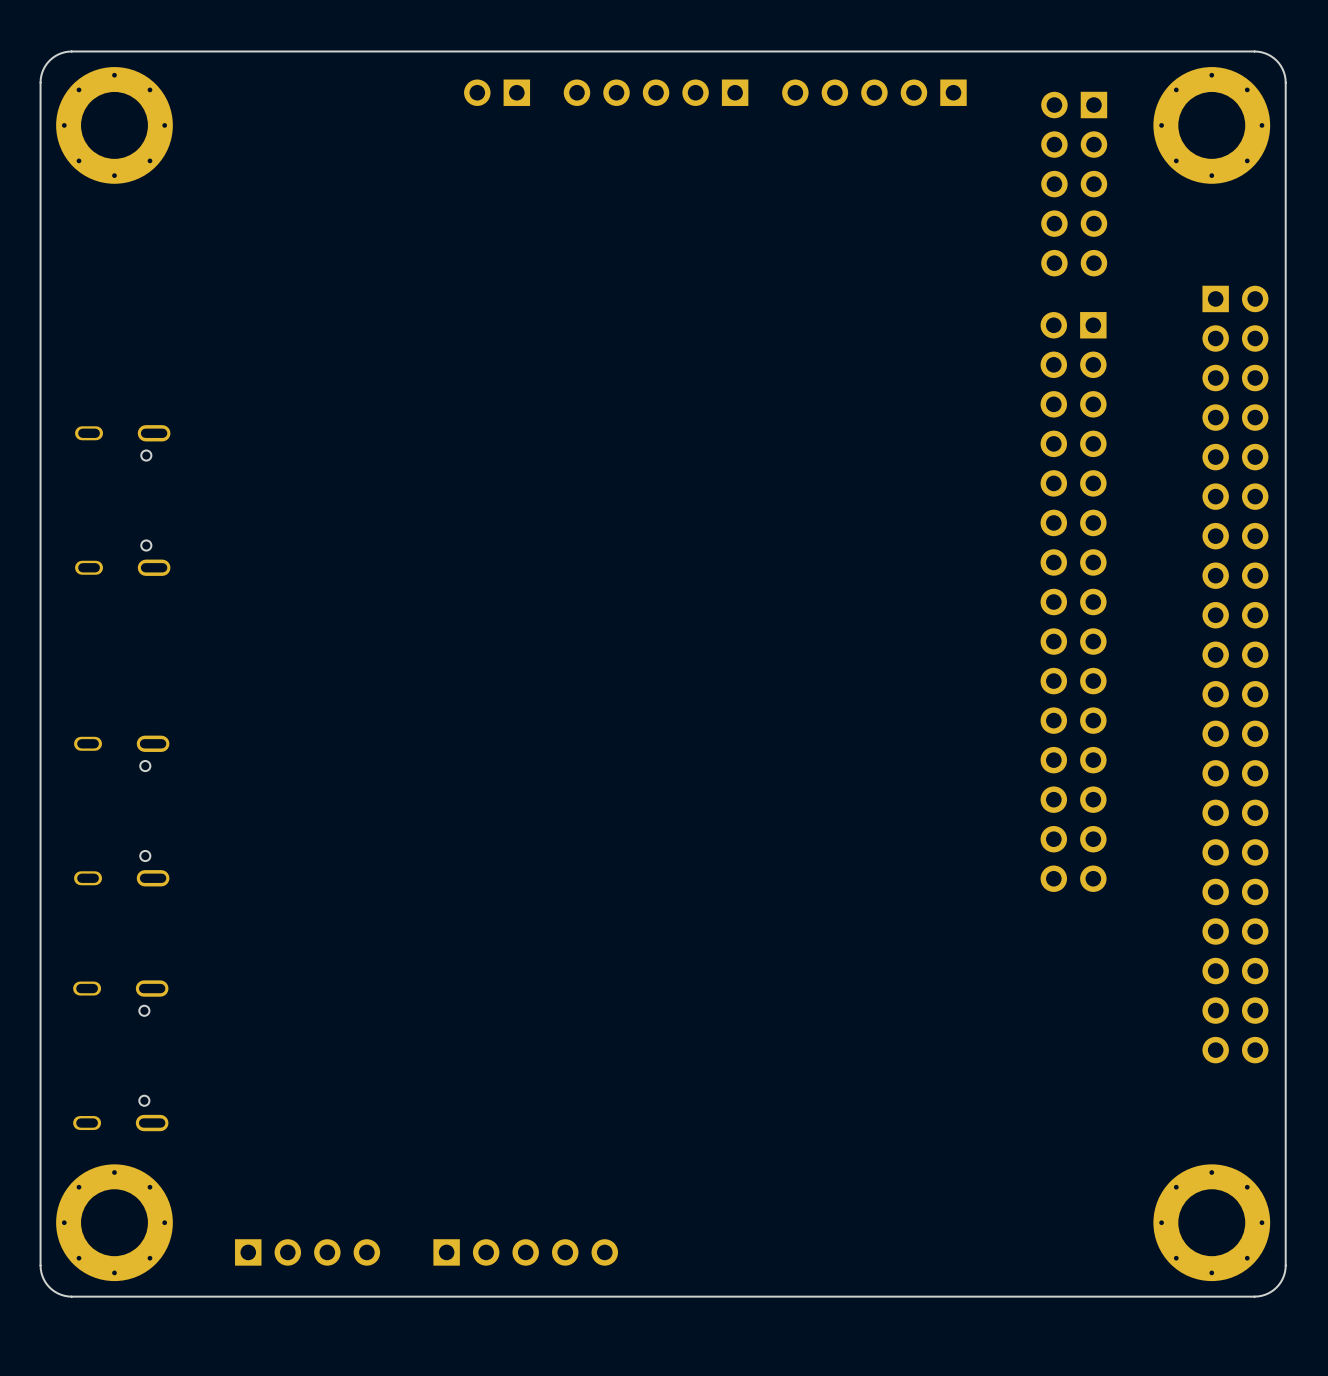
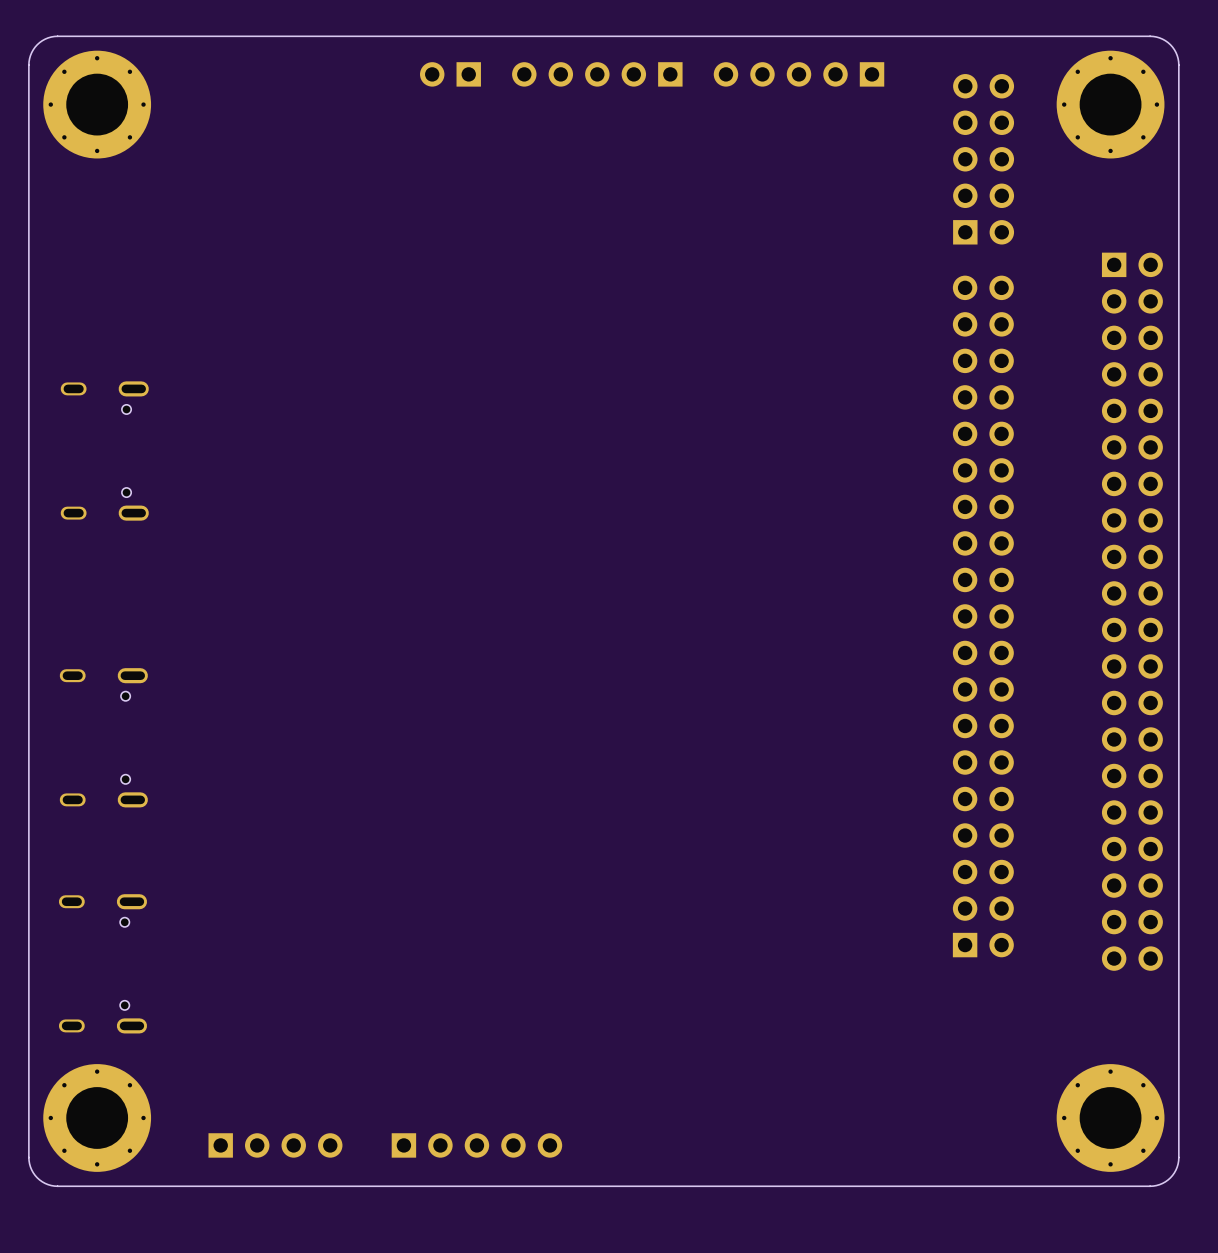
part rotation: 0° (1074, 184) -> 180° (983, 159)
part: (1073, 602) -> none
part: none -> (983, 616)

